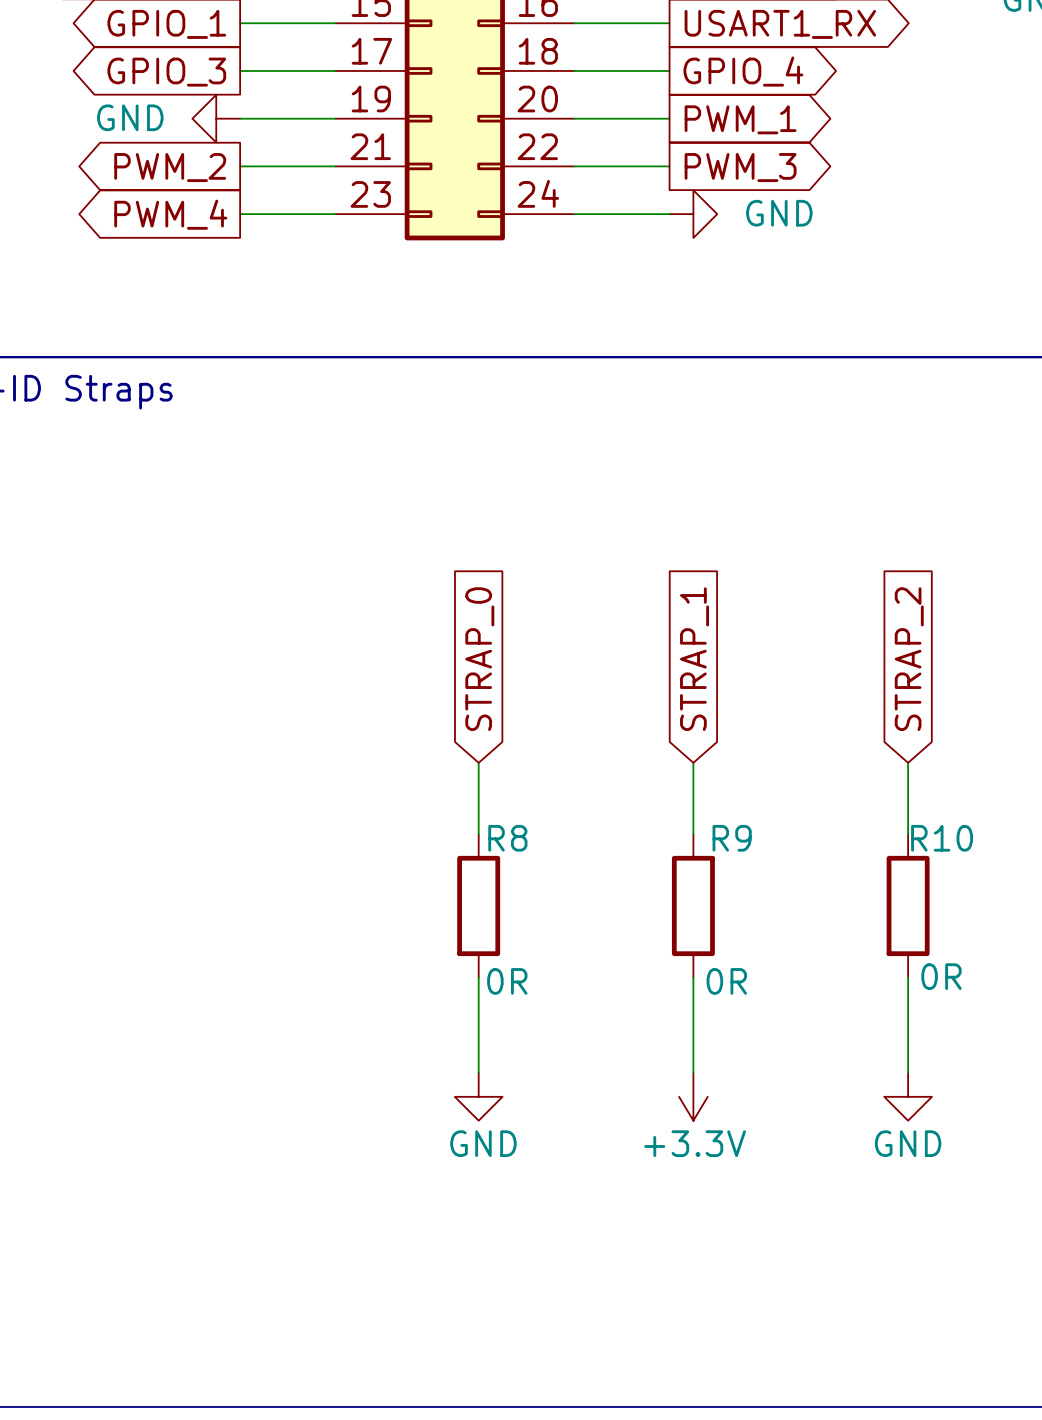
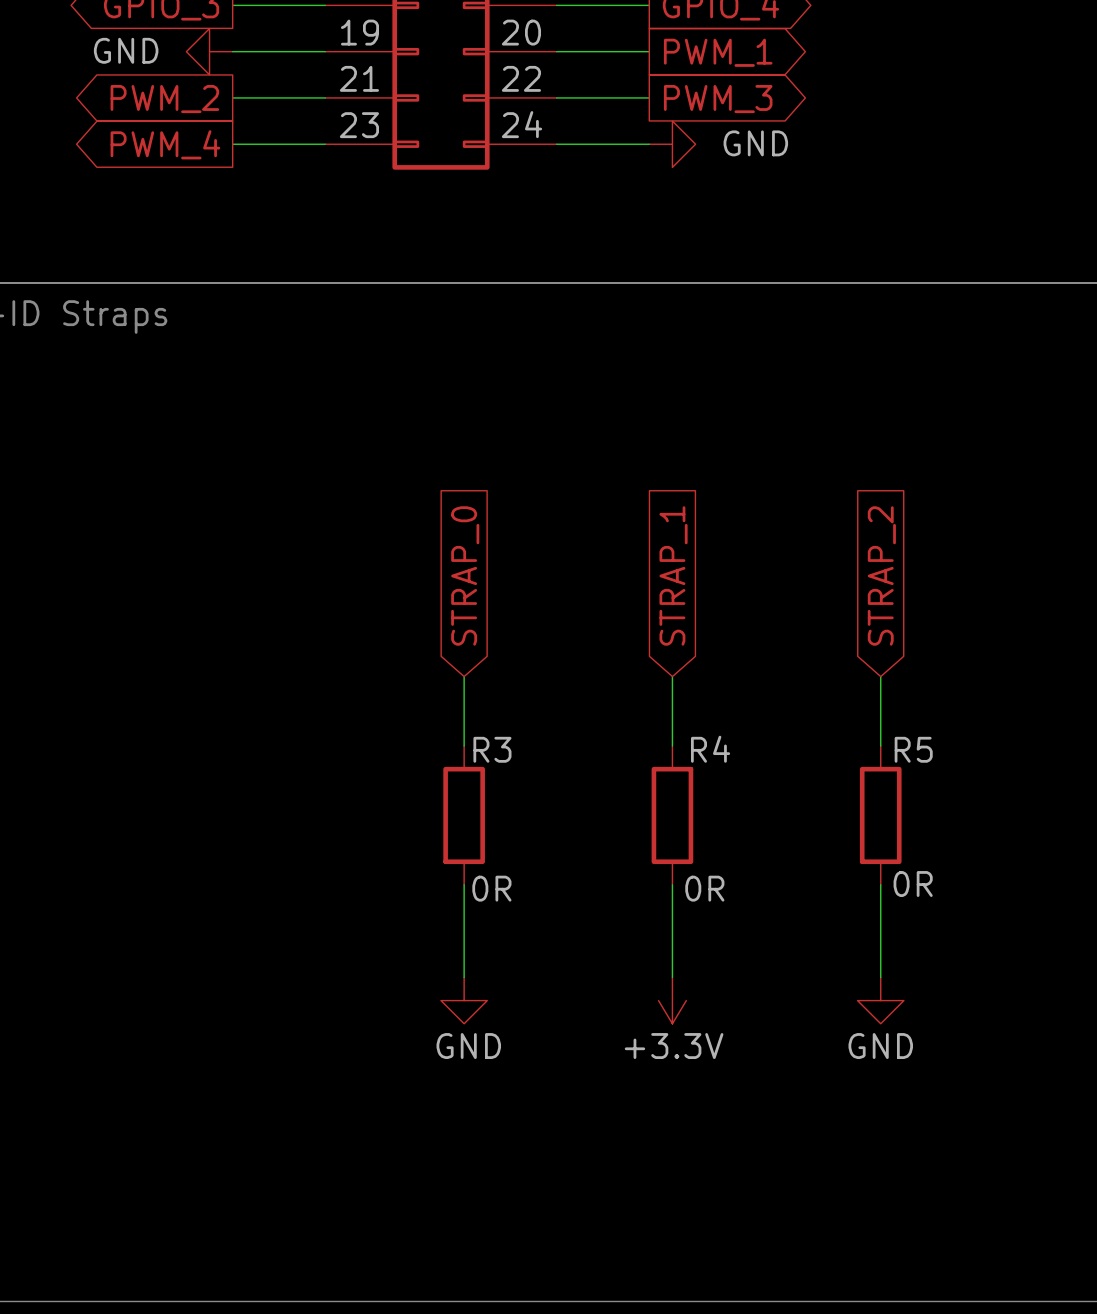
R8 name: R8 (507, 838) -> R3 (492, 749)
R9 name: R9 (732, 838) -> R4 (710, 749)
R10 name: R10 (942, 838) -> R5 (913, 749)

